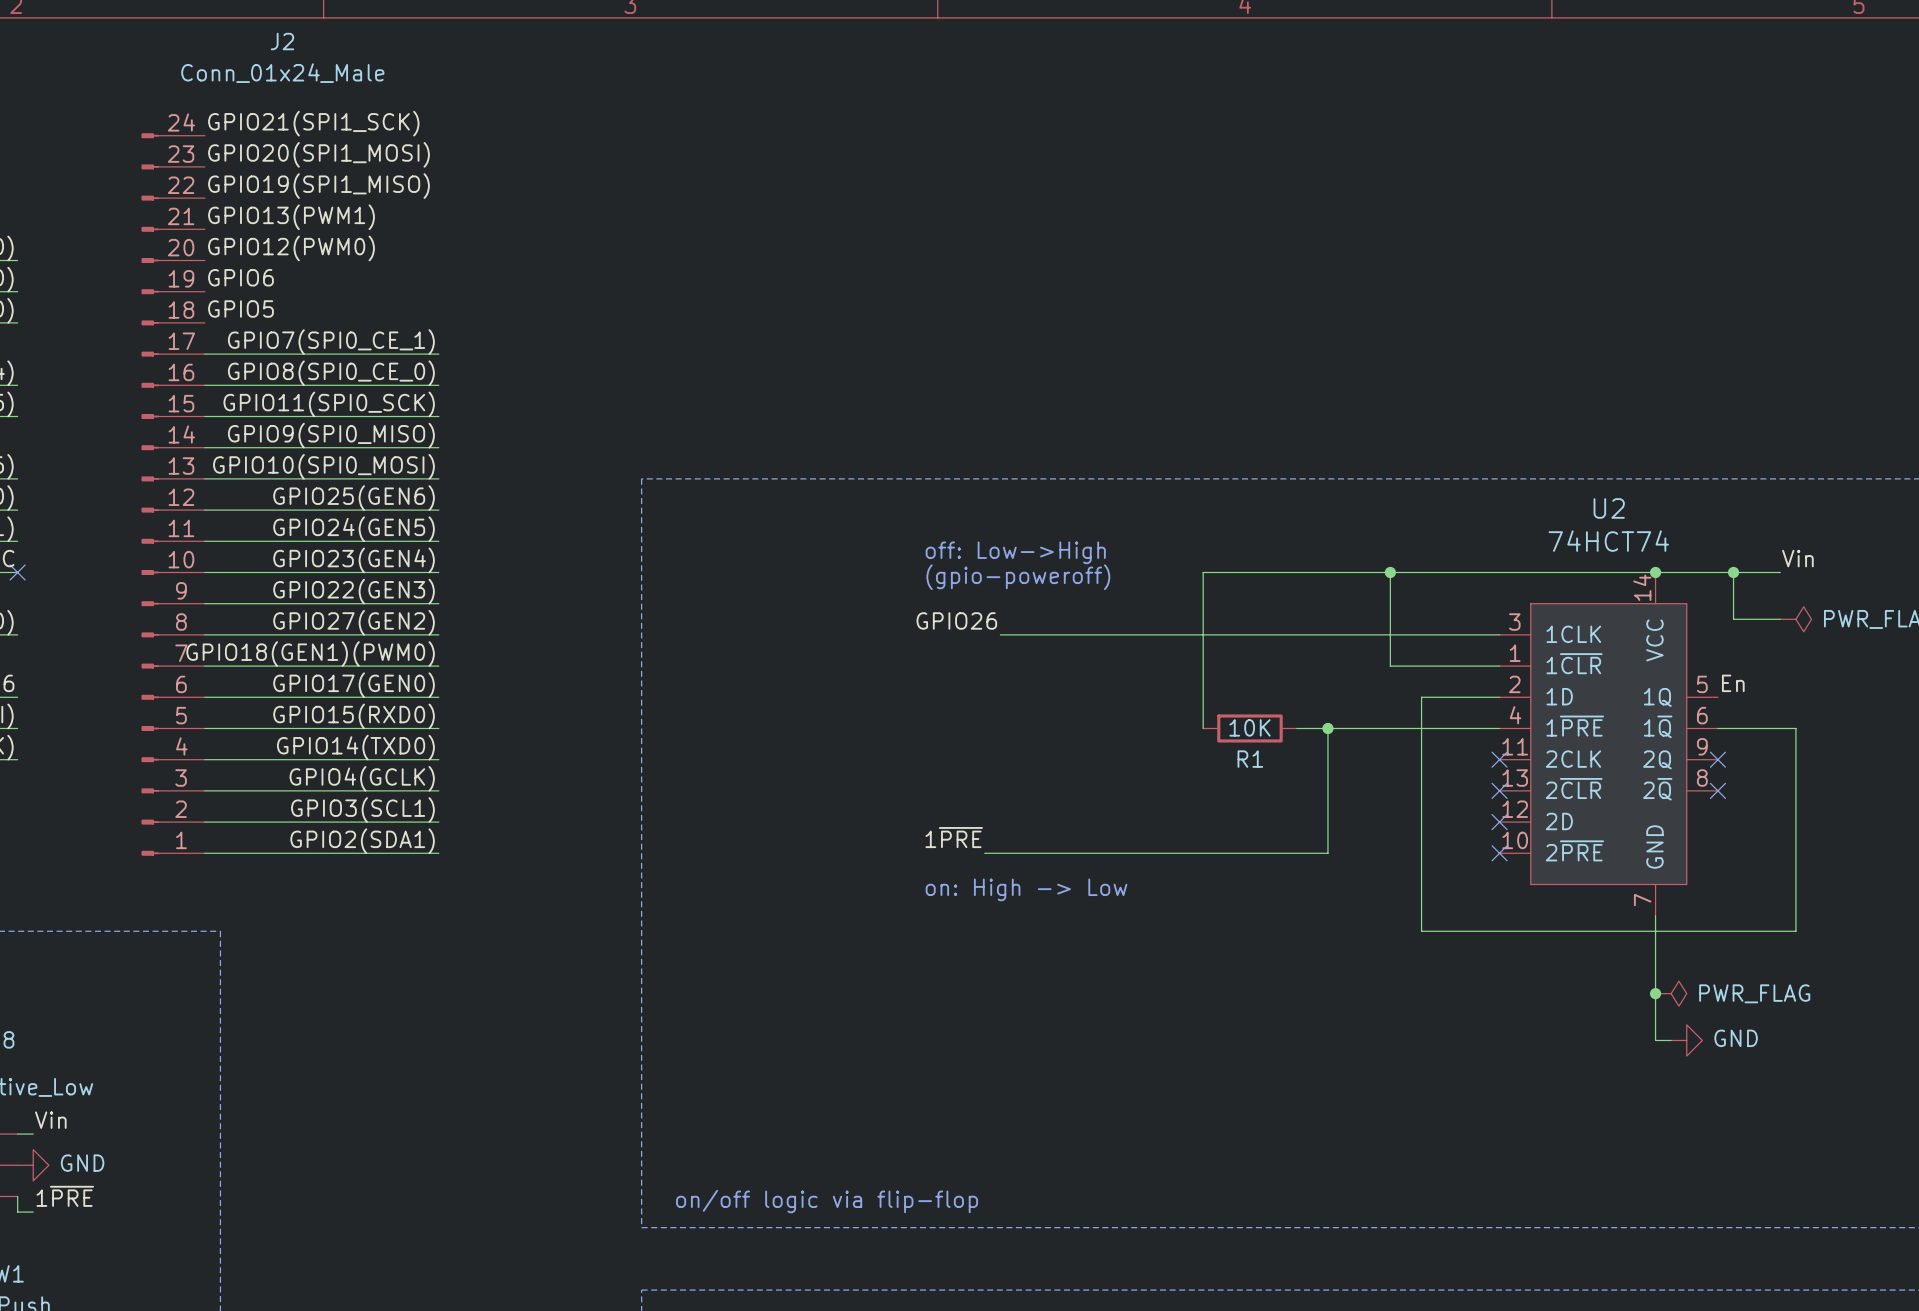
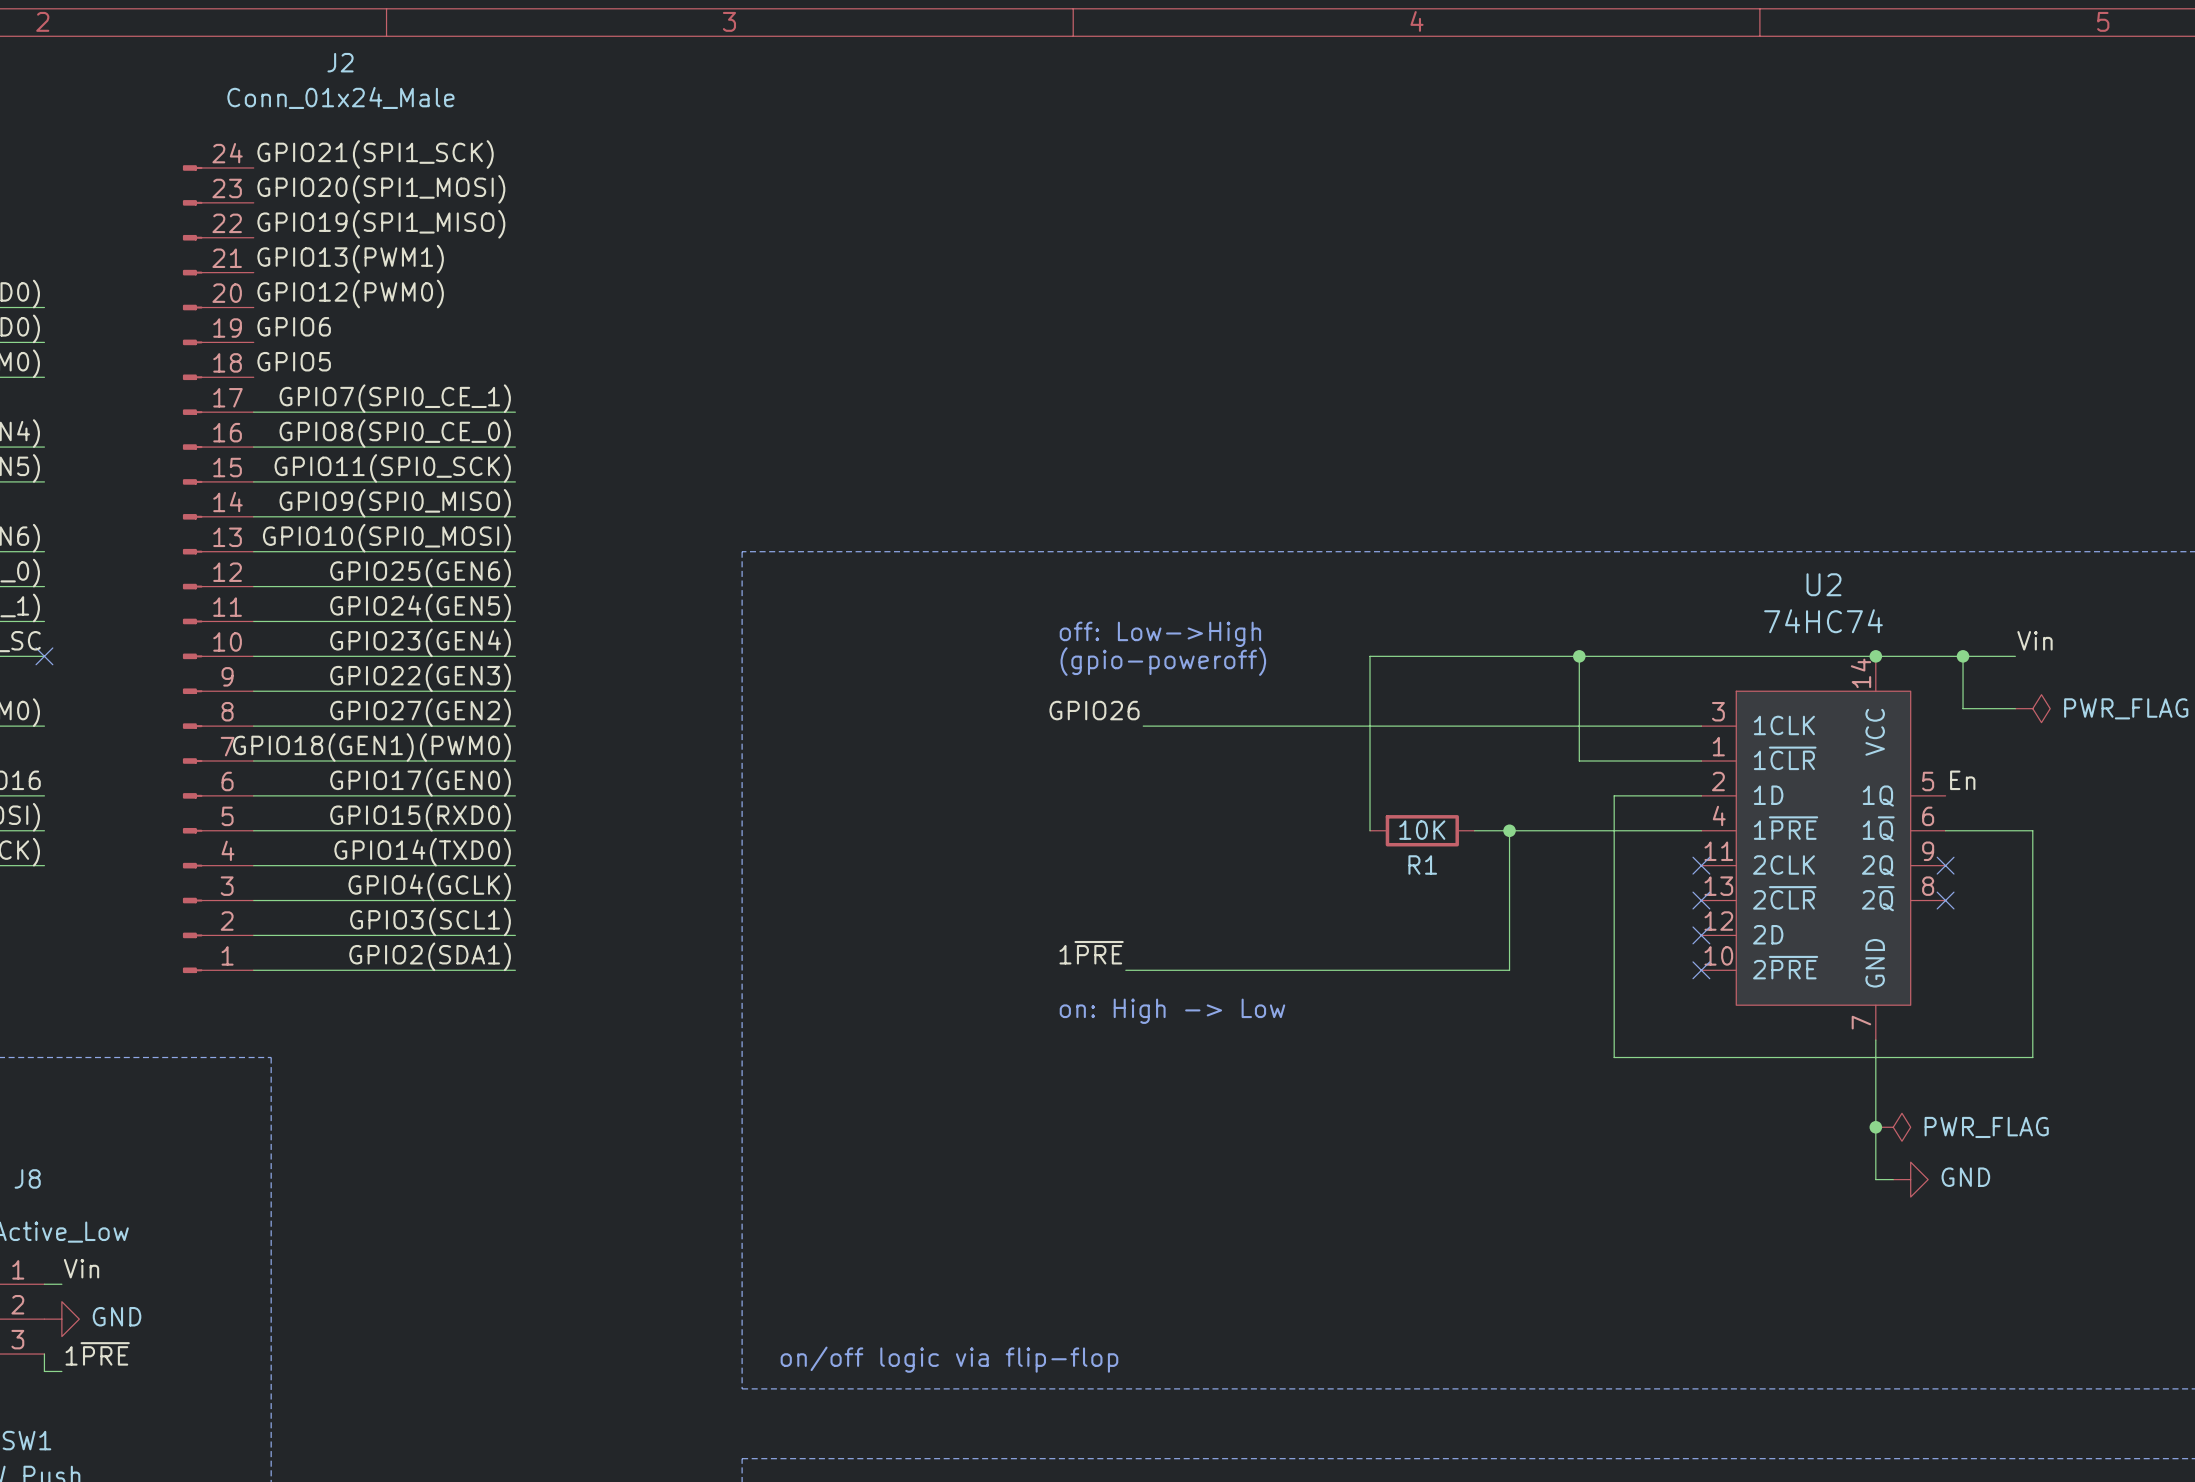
U2 value: 74HCT74 (1608, 541) -> 74HC74 (1823, 621)

